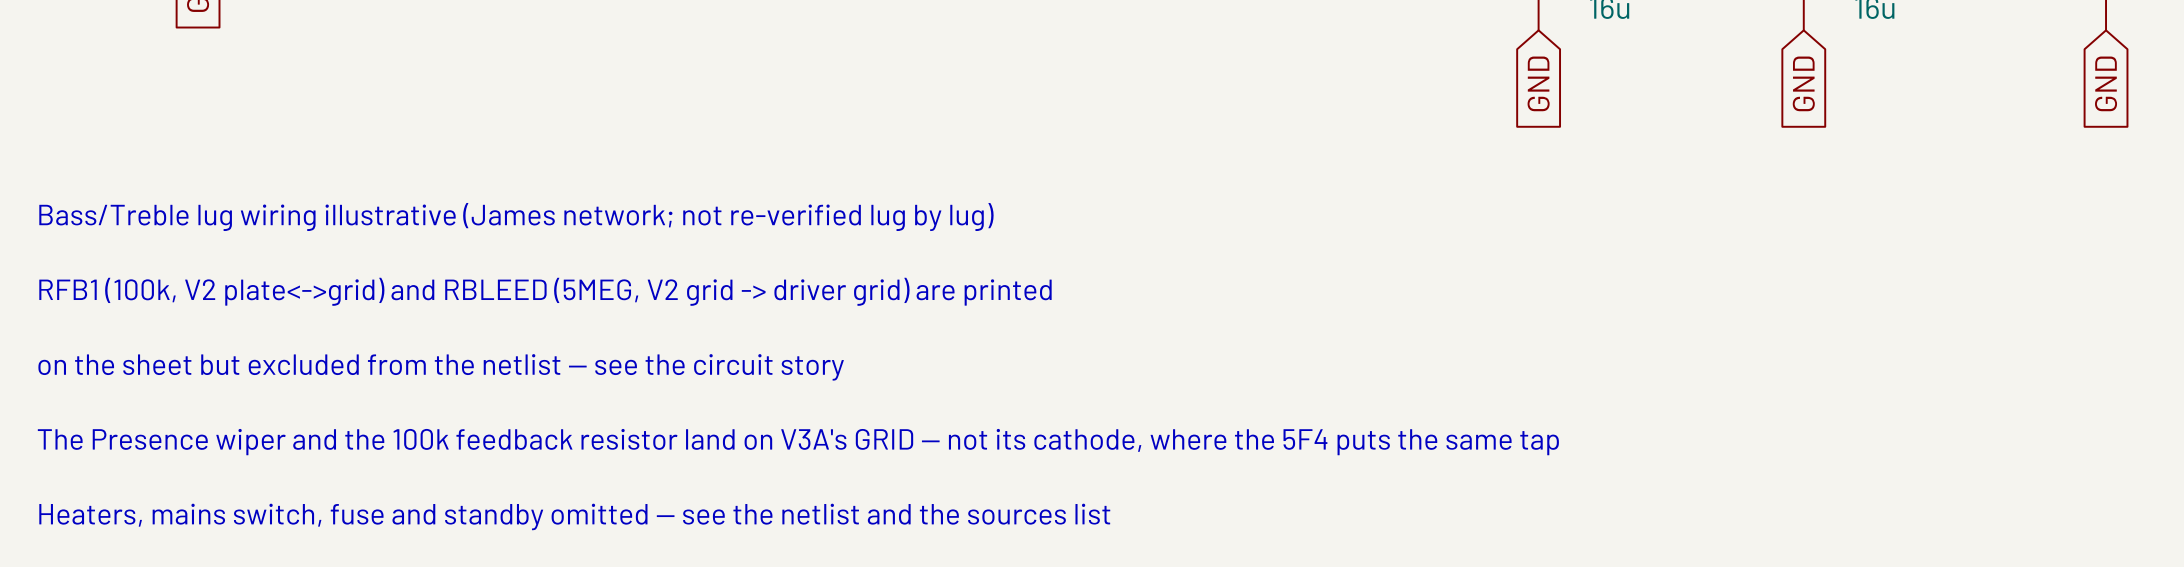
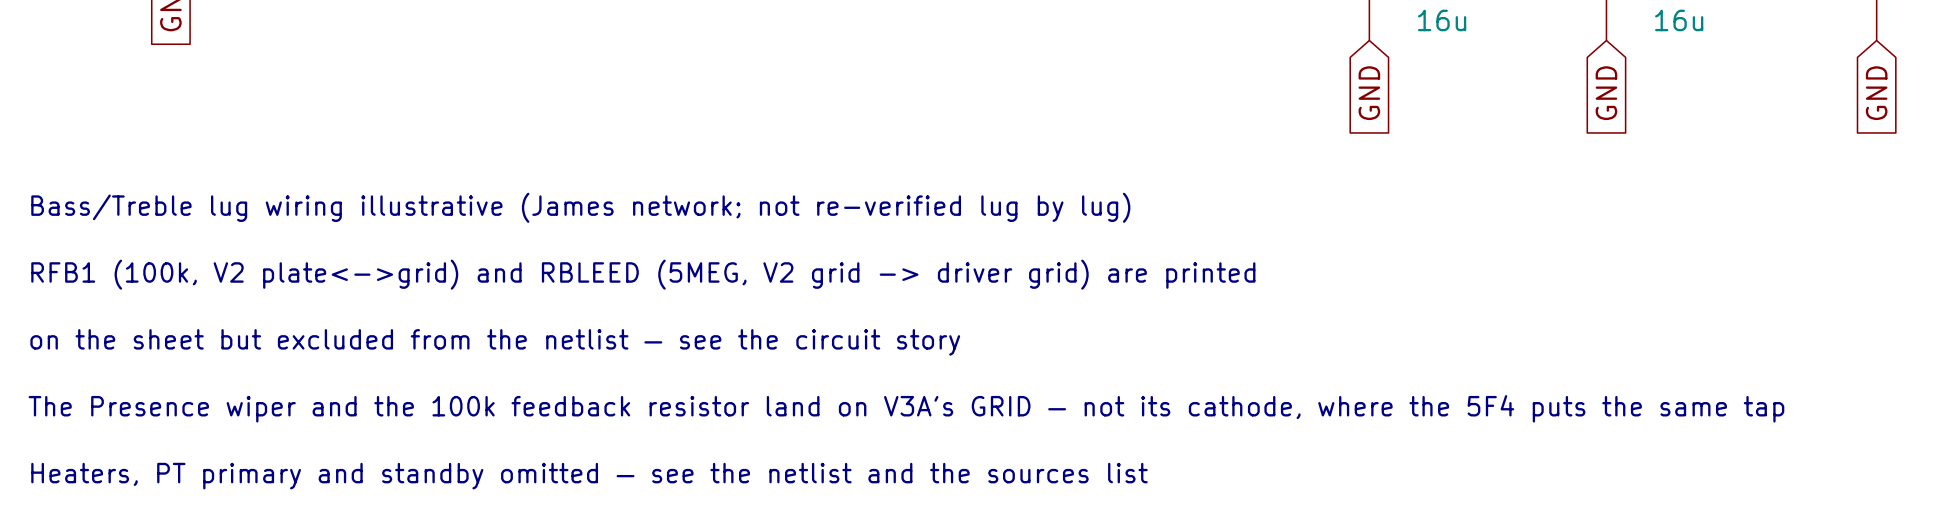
text: Heaters, mains switch, fuse and standby omitted — see the netlist and the sources list (574, 516) -> Heaters, PT primary and standby omitted — see the netlist and the sources list (589, 476)

